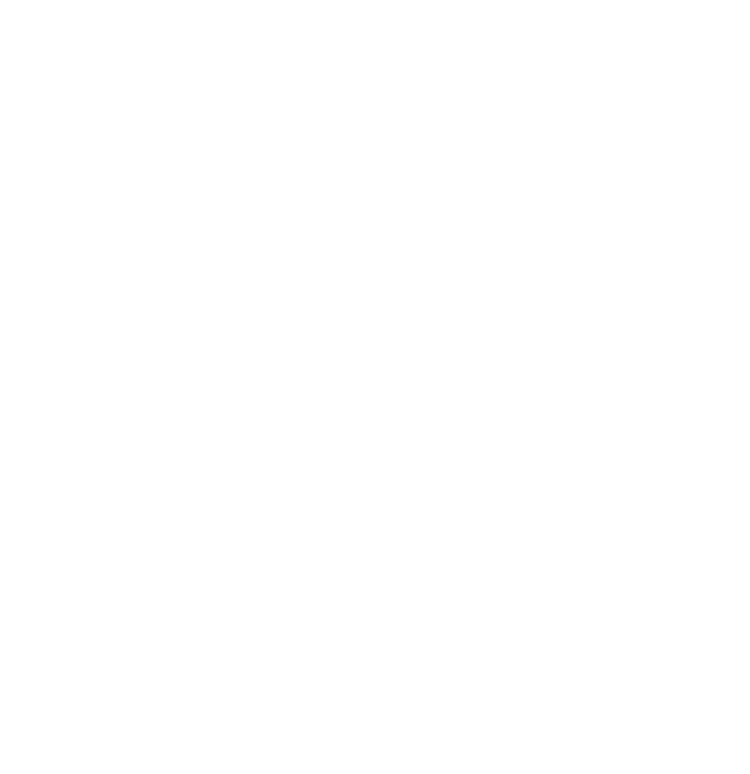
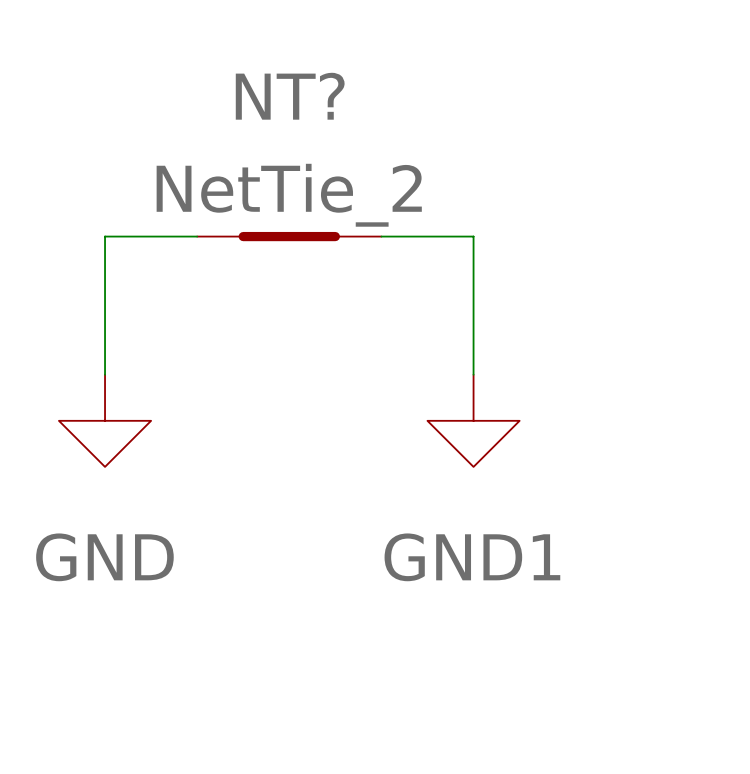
wire: none -> (197, 236) (105, 236) (105, 374)
NT?: none -> NetTie_2 (289, 236)
wire: none -> (381, 236) (473, 236) (473, 374)
power symbol: none -> GND (105, 420)
power symbol: none -> GND1 (473, 420)

